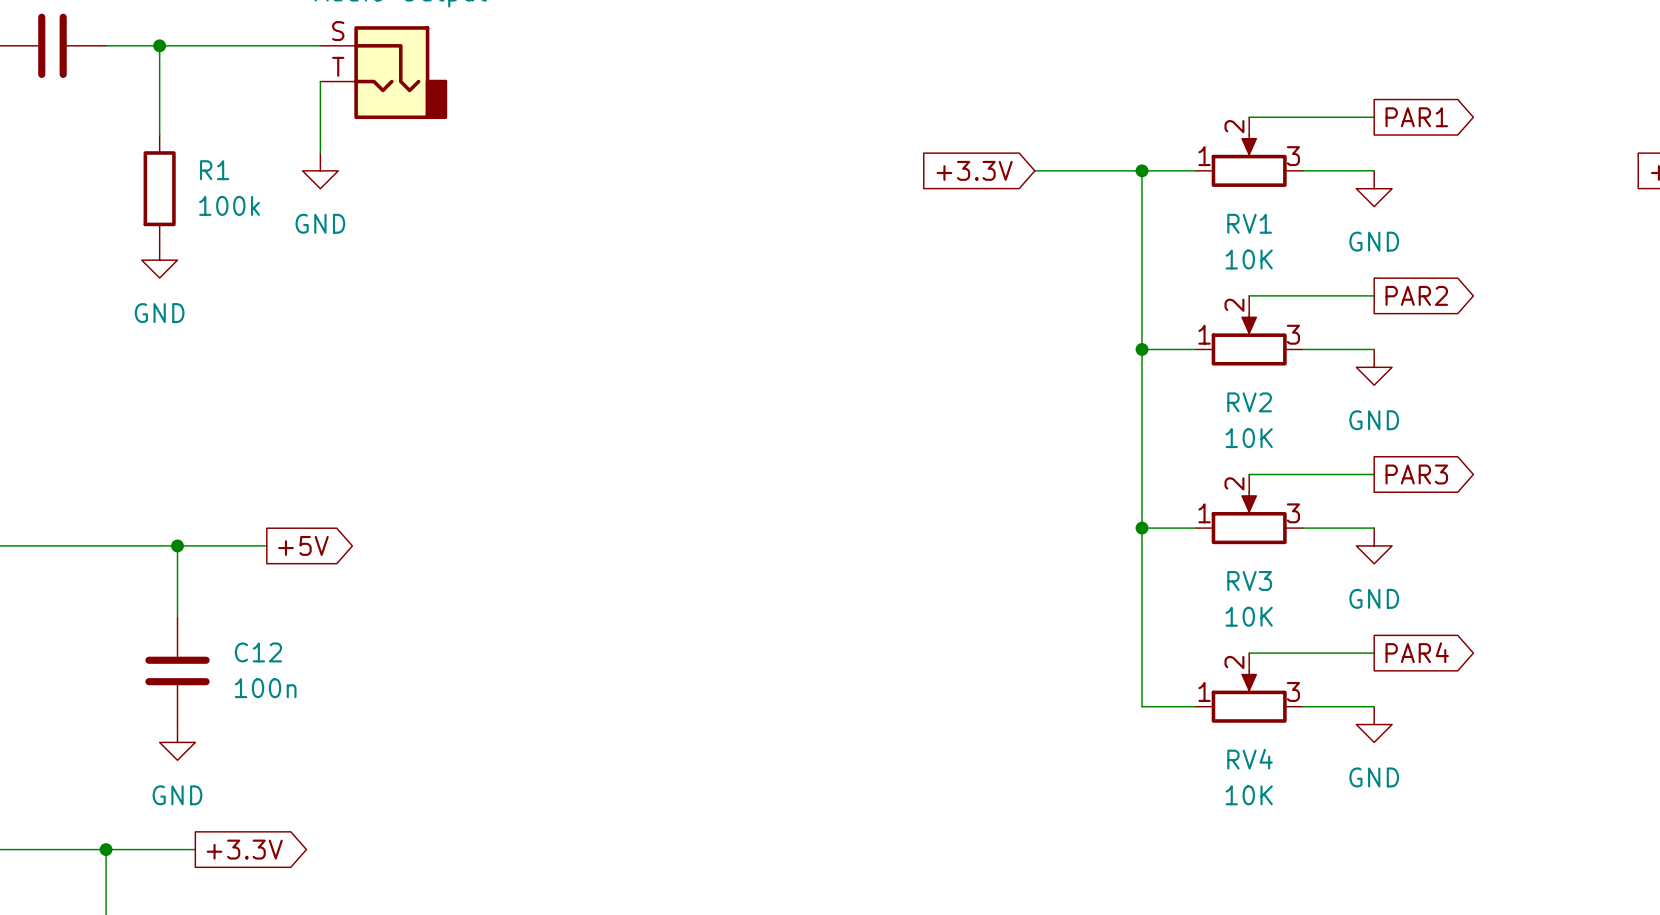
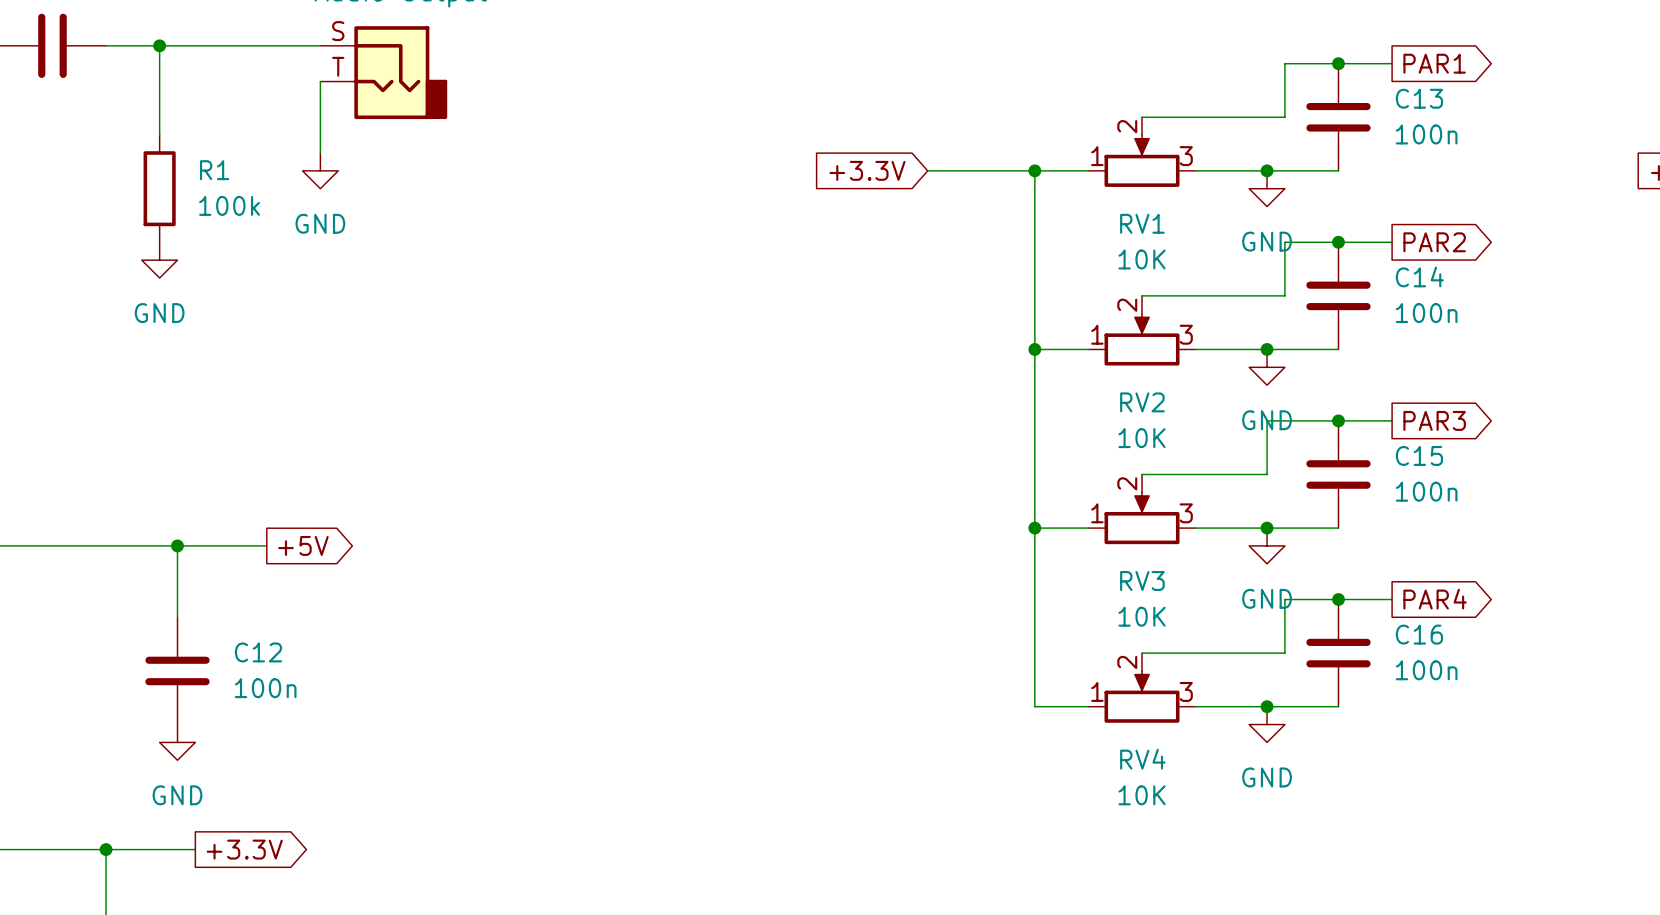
junction: none -> (1338, 63)
wire: none -> (1142, 117) (1249, 117)
wire: (1284, 117) (1374, 117) -> (1284, 117) (1284, 63) (1392, 63)
C13: none -> 100n (1338, 117)
global label position: PAR1 (1416, 117) -> PAR1 (1434, 63)
RV1 position: (1249, 152) -> (1142, 152)
wire: none -> (927, 170) (1034, 170) (1034, 706) (1088, 706)
global label position: +3.3V (974, 170) -> +3.3V (867, 170)
junction: none -> (1034, 170)
wire: (1088, 170) (1195, 170) -> (1302, 170) (1195, 170)
wire: (1142, 170) (1142, 706) (1195, 706) -> (1302, 706) (1195, 706)
junction: (1142, 170) -> none
junction: none -> (1267, 170)
wire: (1338, 170) (1374, 170) -> none
power symbol: none -> GND (1267, 188)
power symbol: GND (1374, 188) -> none
junction: none -> (1338, 242)
wire: none -> (1142, 295) (1249, 295)
wire: (1284, 295) (1374, 295) -> (1284, 295) (1284, 242) (1392, 242)
C14: none -> 100n (1338, 295)
global label position: PAR2 (1416, 295) -> PAR2 (1434, 242)
RV2 position: (1249, 330) -> (1142, 330)
wire: none -> (1034, 349) (1088, 349)
junction: none -> (1034, 349)
wire: (1142, 349) (1195, 349) -> (1302, 349) (1195, 349)
junction: (1142, 349) -> none
junction: none -> (1267, 349)
wire: (1338, 349) (1374, 349) -> none
power symbol: none -> GND (1267, 367)
power symbol: GND (1374, 367) -> none
junction: none -> (1338, 420)
wire: none -> (1142, 474) (1249, 474)
wire: (1267, 474) (1374, 474) -> (1267, 474) (1267, 420) (1392, 420)
C15: none -> 100n (1338, 474)
global label position: PAR3 (1416, 474) -> PAR3 (1434, 420)
RV3 position: (1249, 509) -> (1142, 509)
wire: none -> (1034, 528) (1088, 528)
junction: none -> (1034, 528)
wire: (1142, 528) (1195, 528) -> (1302, 528) (1195, 528)
junction: (1142, 528) -> none
junction: none -> (1267, 528)
wire: (1338, 528) (1374, 528) -> none
power symbol: none -> GND (1267, 545)
power symbol: GND (1374, 545) -> none
junction: none -> (1338, 599)
global label position: PAR4 (1417, 652) -> PAR4 (1435, 599)
wire: none -> (1142, 653) (1249, 653)
wire: (1284, 653) (1374, 653) -> (1284, 653) (1284, 599) (1392, 599)
C16: none -> 100n (1338, 653)
RV4 position: (1249, 687) -> (1142, 687)
junction: none -> (1267, 706)
wire: (1338, 706) (1374, 706) -> none
power symbol: none -> GND (1267, 724)
power symbol: GND (1374, 724) -> none

